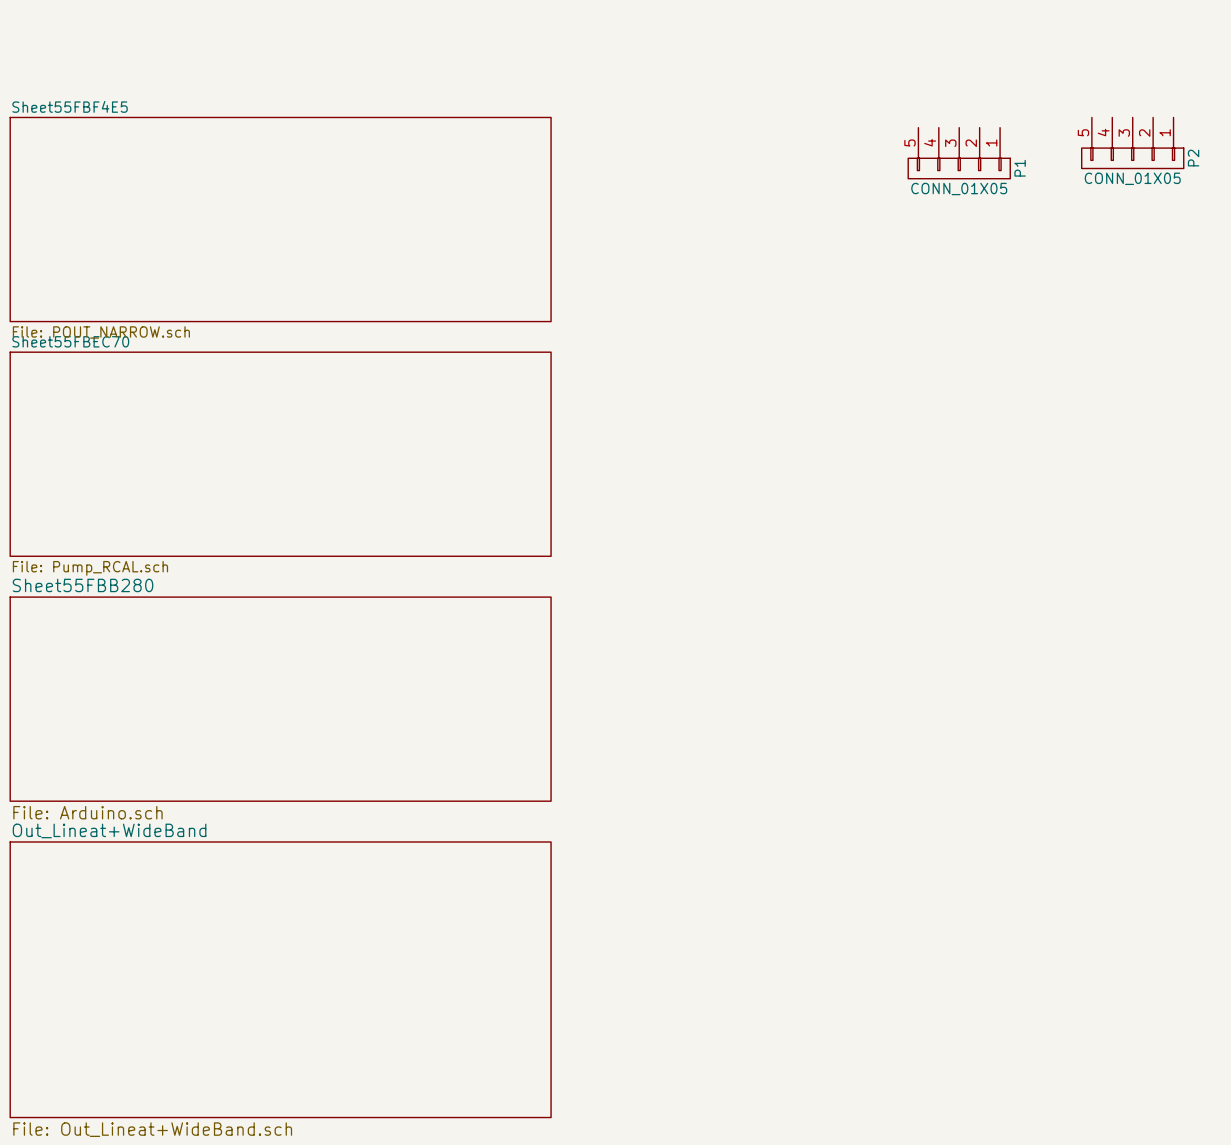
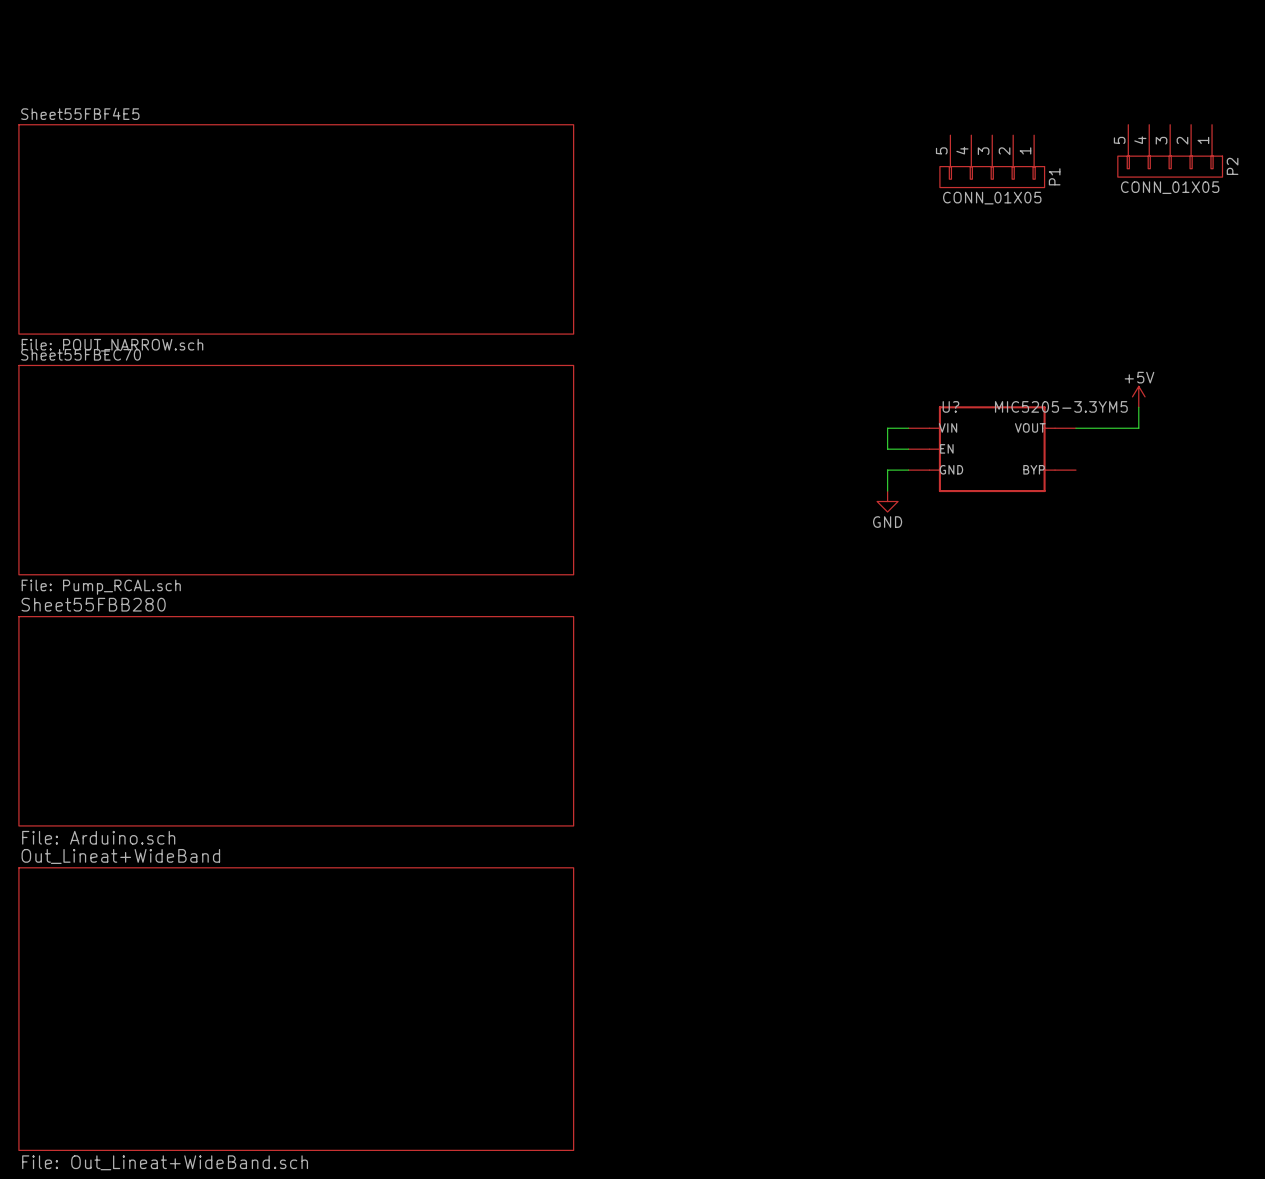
power symbol: none -> +5V (1138, 396)
wire: none -> (1138, 407) (1138, 428) (1075, 428)
wire: none -> (908, 428) (887, 428) (887, 449) (908, 449)
U?: none -> MIC5205-3.3YM5 (992, 449)
wire: none -> (908, 470) (887, 470) (887, 491)
power symbol: none -> GND (887, 501)

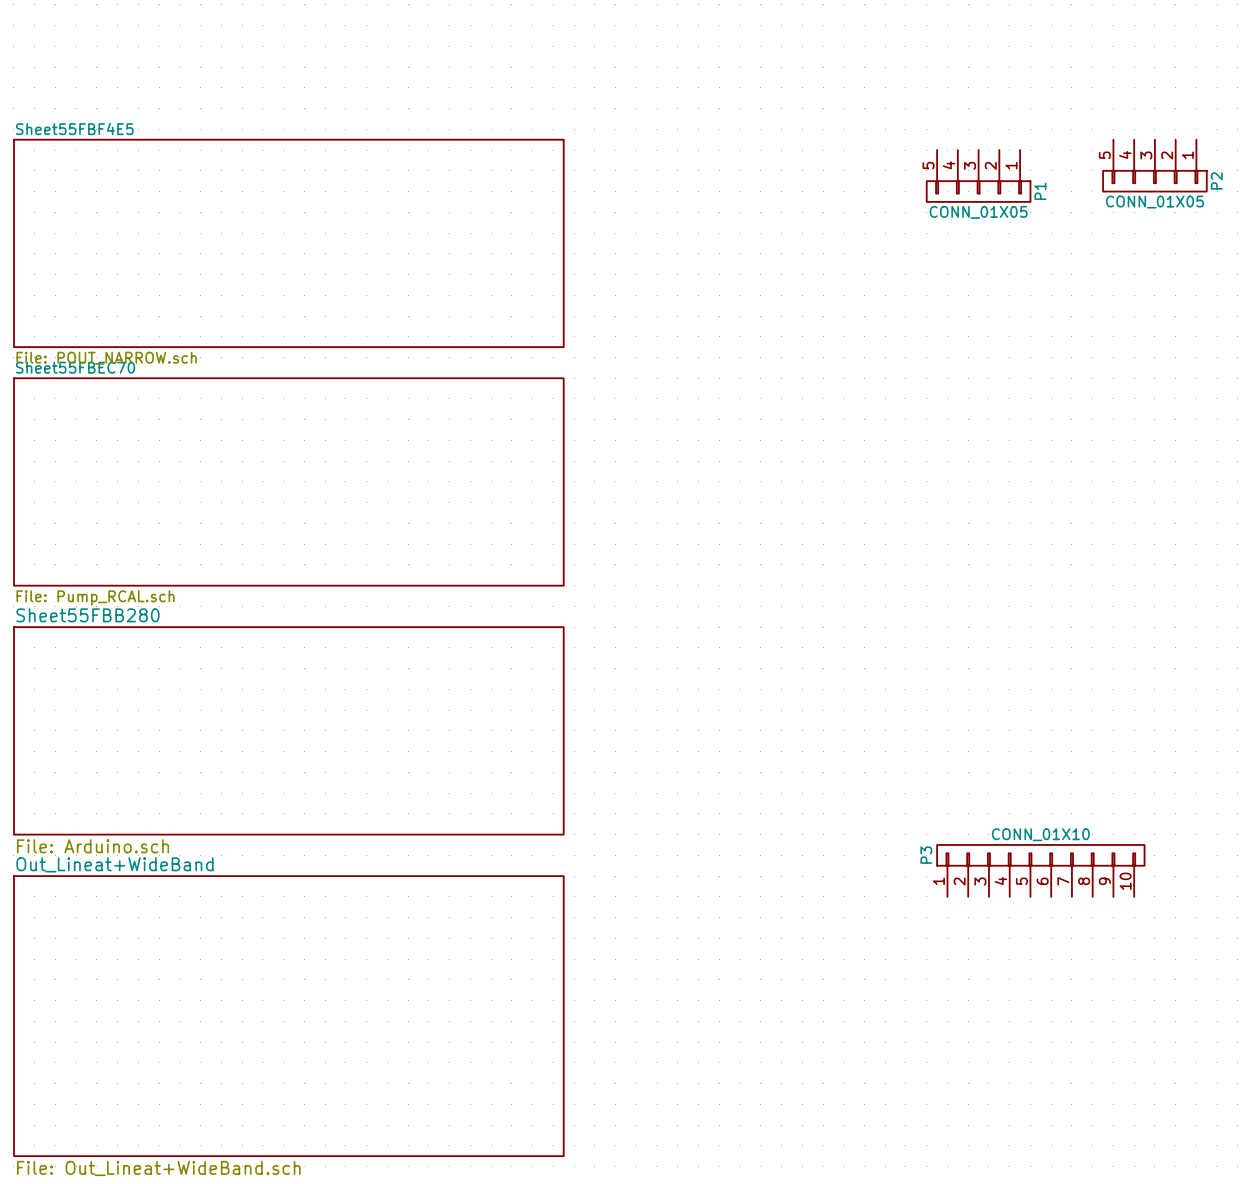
power symbol: +5V (1138, 396) -> none
wire: (1138, 407) (1138, 428) (1075, 428) -> none
wire: (908, 428) (887, 428) (887, 449) (908, 449) -> none
U?: MIC5205-3.3YM5 (992, 449) -> none
wire: (908, 470) (887, 470) (887, 491) -> none
power symbol: GND (887, 501) -> none
P3: none -> CONN_01X10 (1040, 870)

